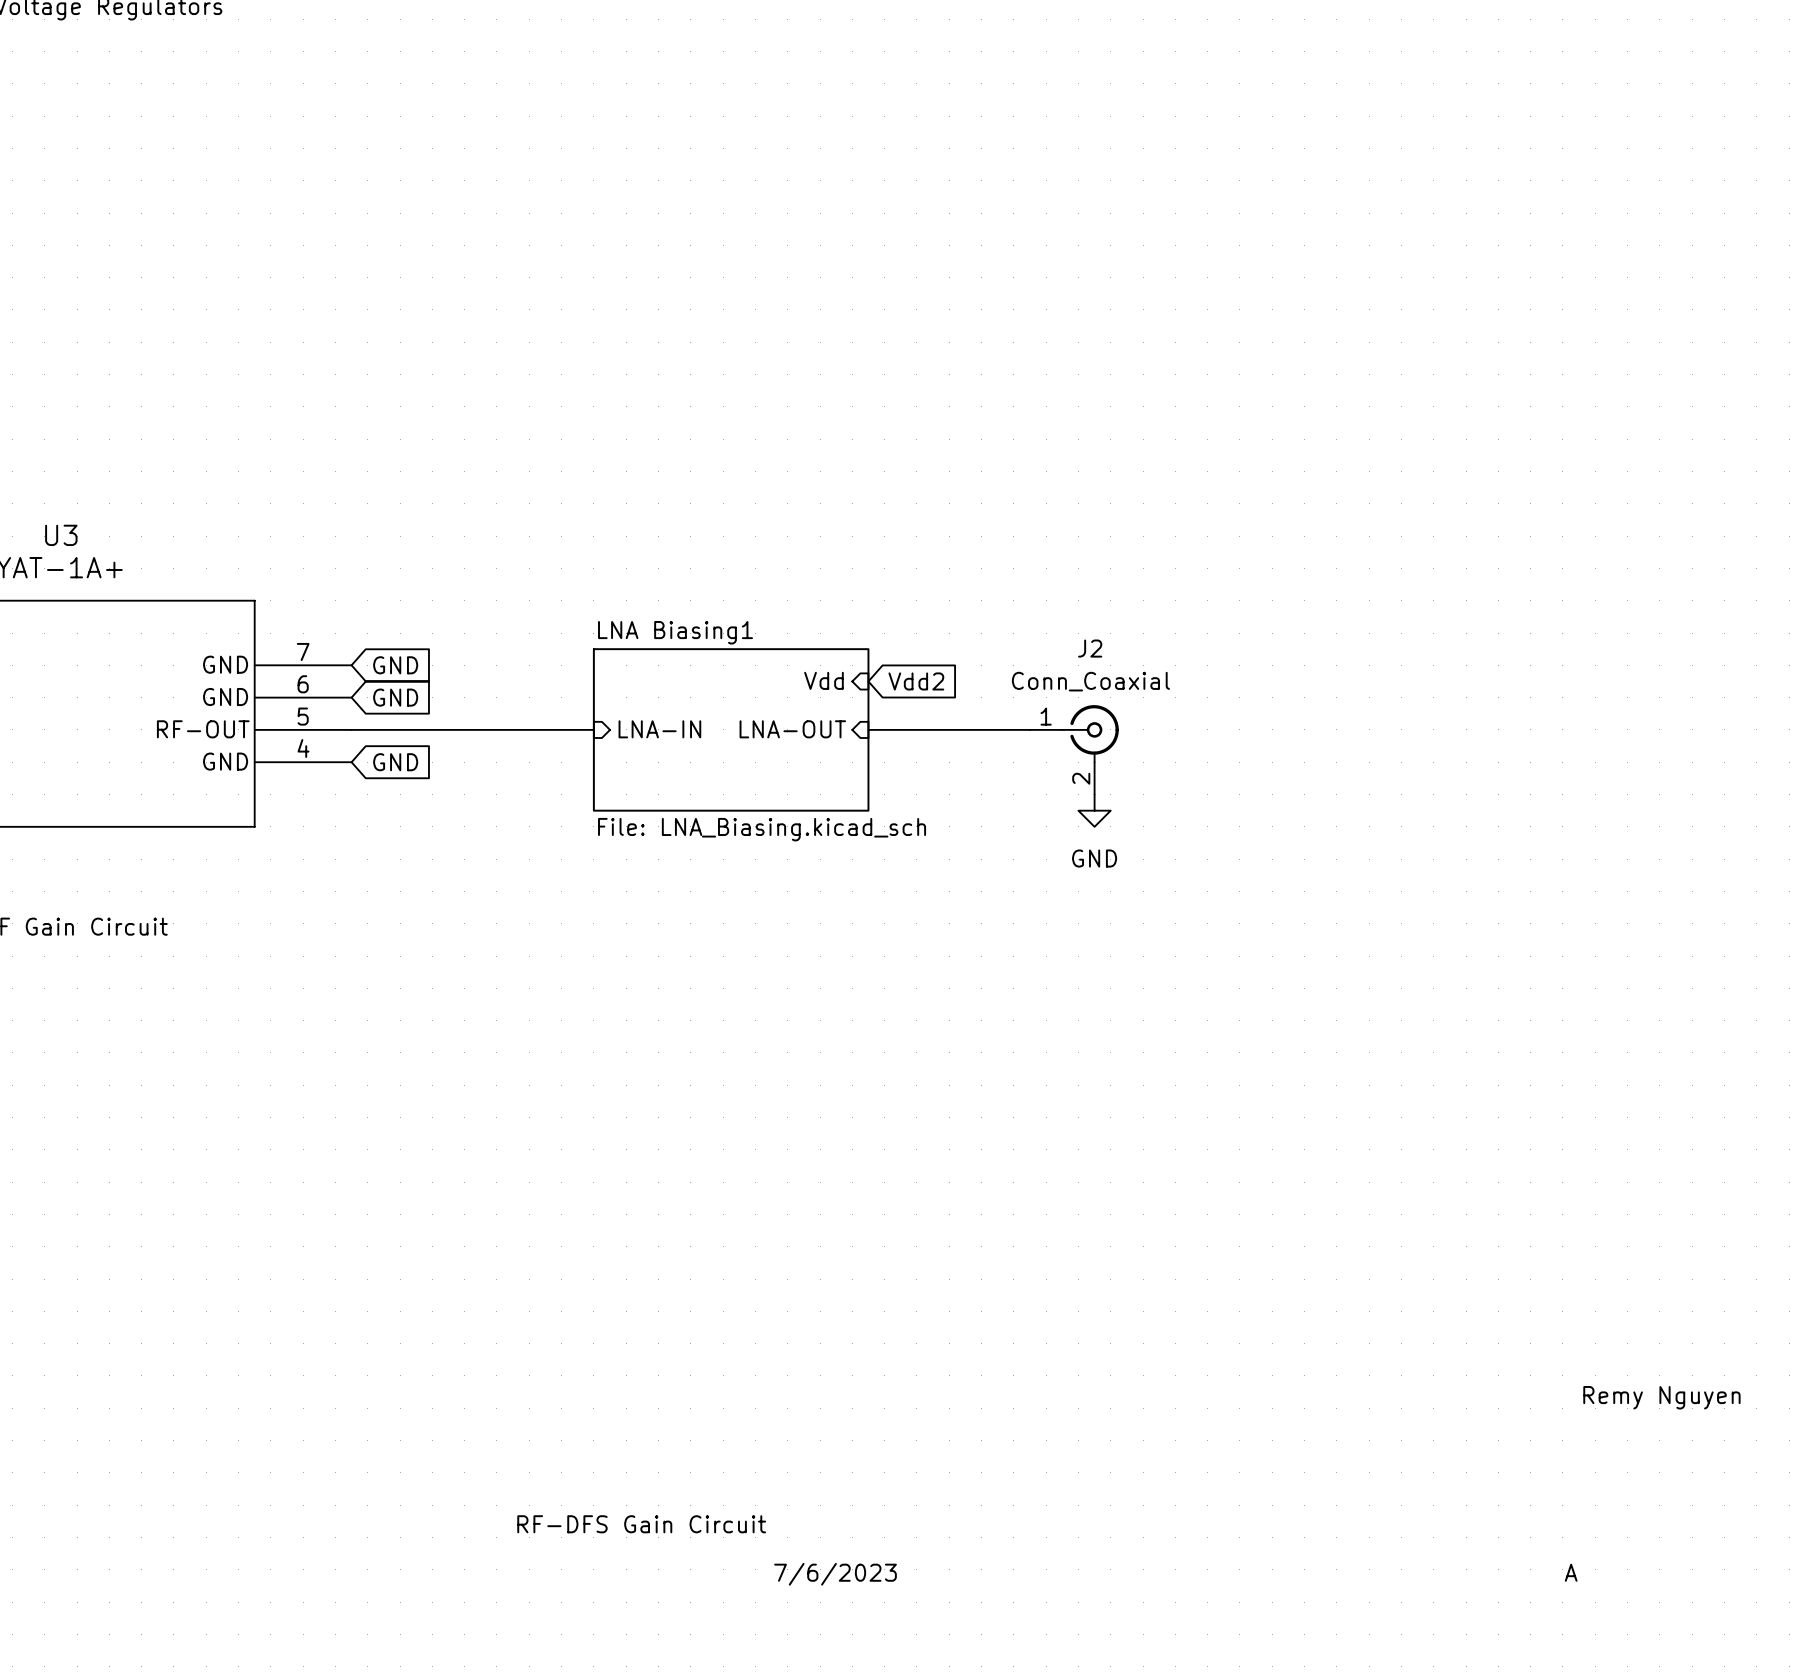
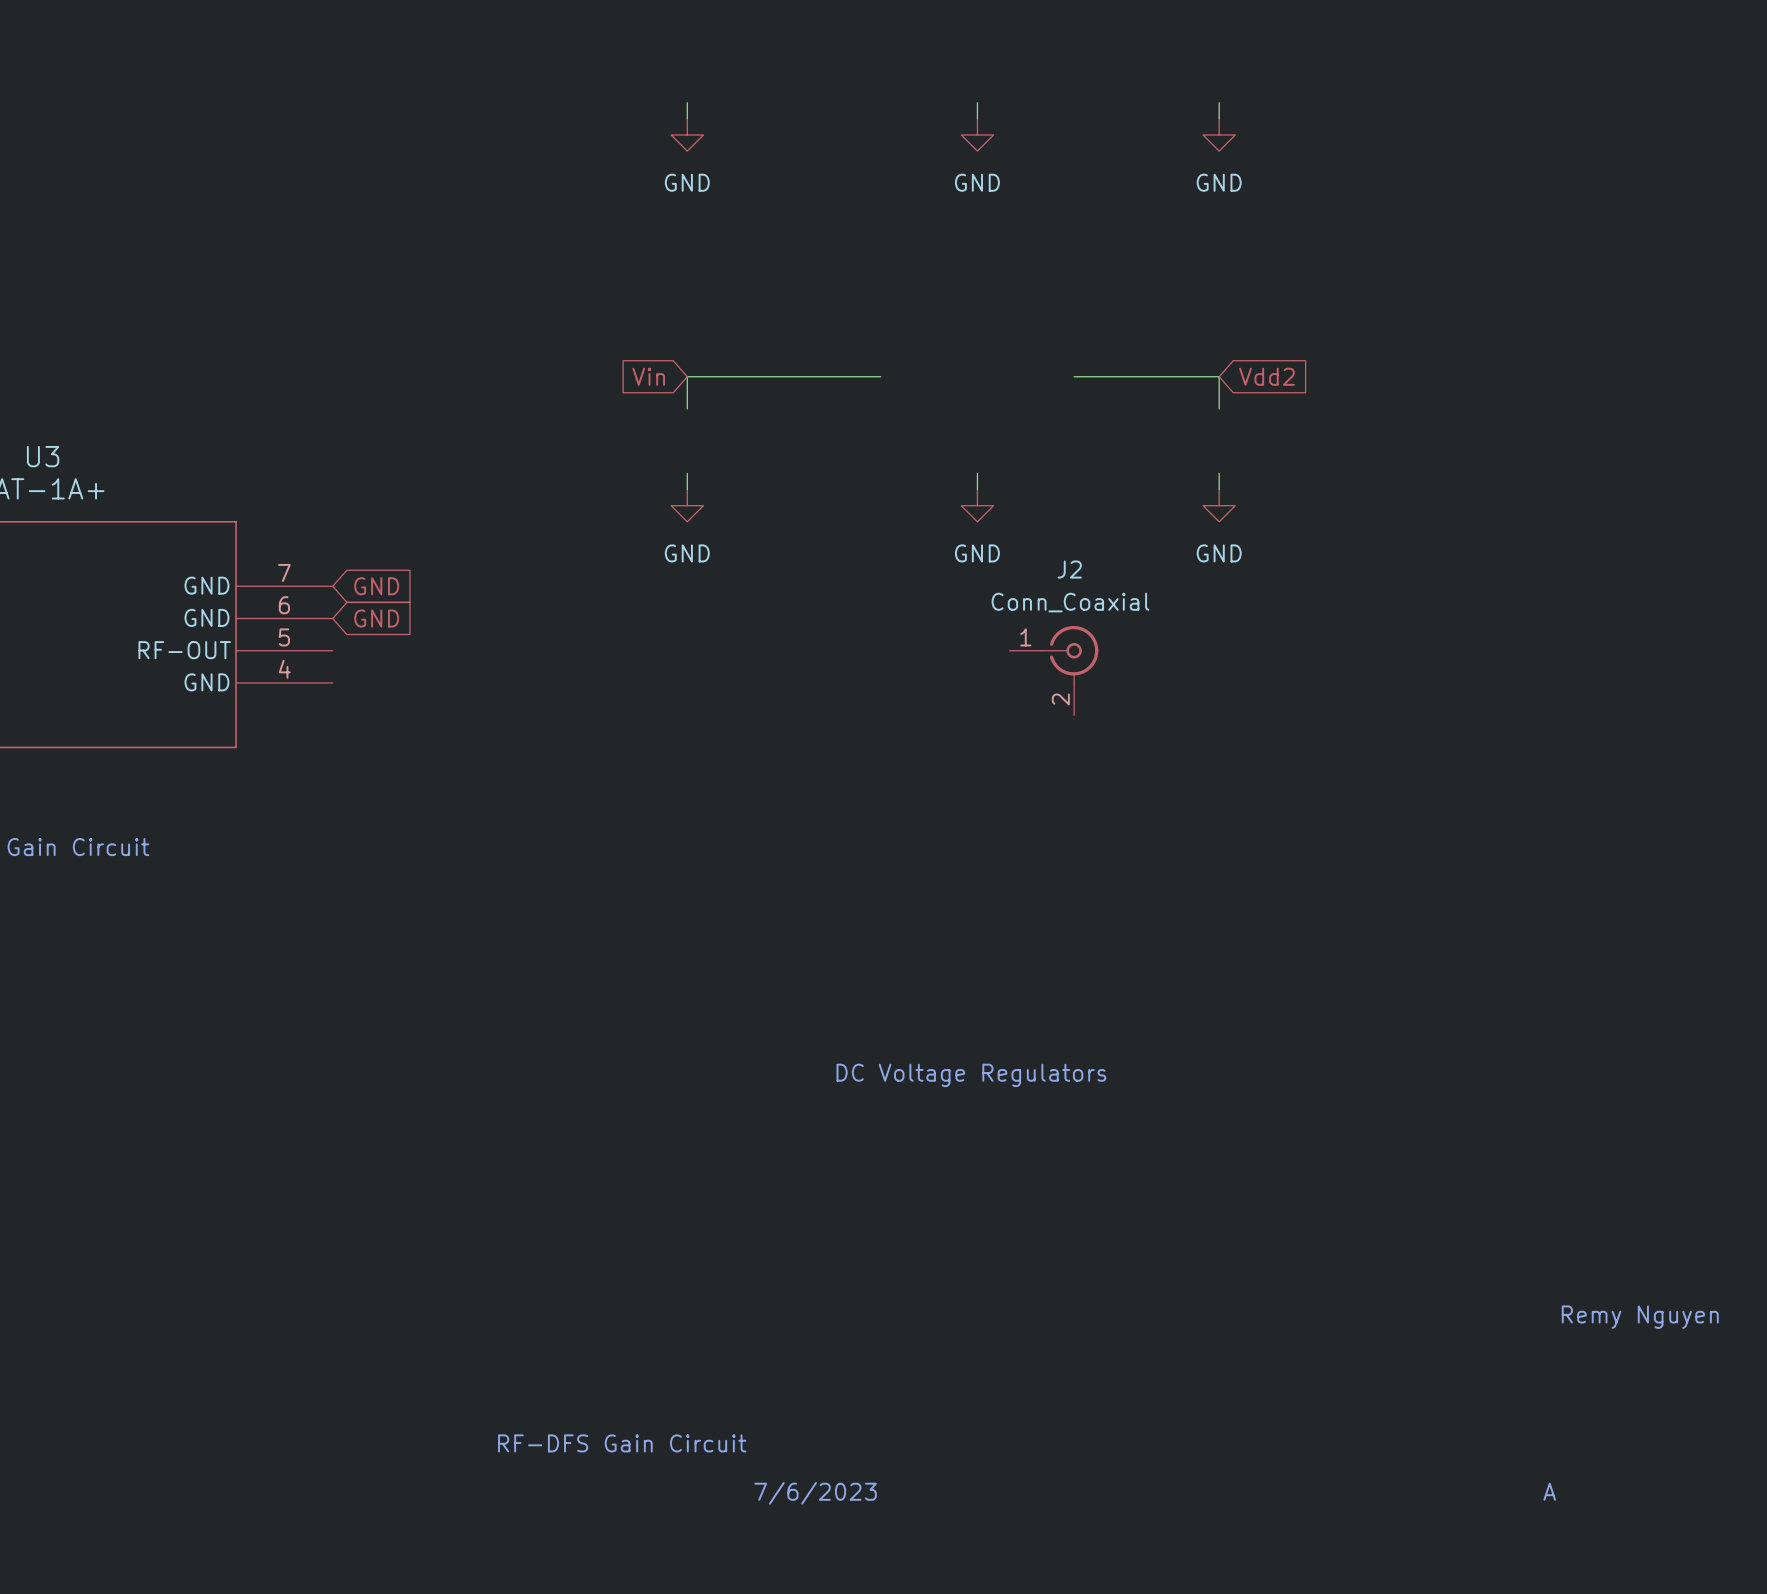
wire: none -> (687, 102) (687, 118)
wire: none -> (977, 102) (977, 118)
wire: none -> (1219, 102) (1219, 118)
power symbol: none -> GND (687, 134)
power symbol: none -> GND (977, 134)
power symbol: none -> GND (1219, 134)
global label: none -> Vin (648, 376)
wire: none -> (880, 376) (687, 376) (687, 408)
wire: none -> (1074, 376) (1219, 376) (1219, 408)
global label: none -> Vdd2 (1266, 376)
wire: none -> (687, 473) (687, 489)
wire: none -> (977, 473) (977, 489)
wire: none -> (1219, 473) (1219, 489)
power symbol: none -> GND (687, 505)
power symbol: none -> GND (977, 505)
power symbol: none -> GND (1219, 505)
sheet pin: Vdd (823, 680) -> none
global label: Vdd2 (916, 681) -> none
wire: (351, 729) (593, 729) -> none
sheet pin: LNA-IN (659, 729) -> none
sheet LNA Biasing1: File: LNA_Biasing.kicad_sch (731, 729) -> none
sheet pin: LNA-OUT (792, 729) -> none
wire: (868, 729) (1029, 729) -> none
global label: GND (395, 762) -> none
power symbol: GND (1094, 810) -> none
text: none -> DC Voltage Regulators (971, 1075)

